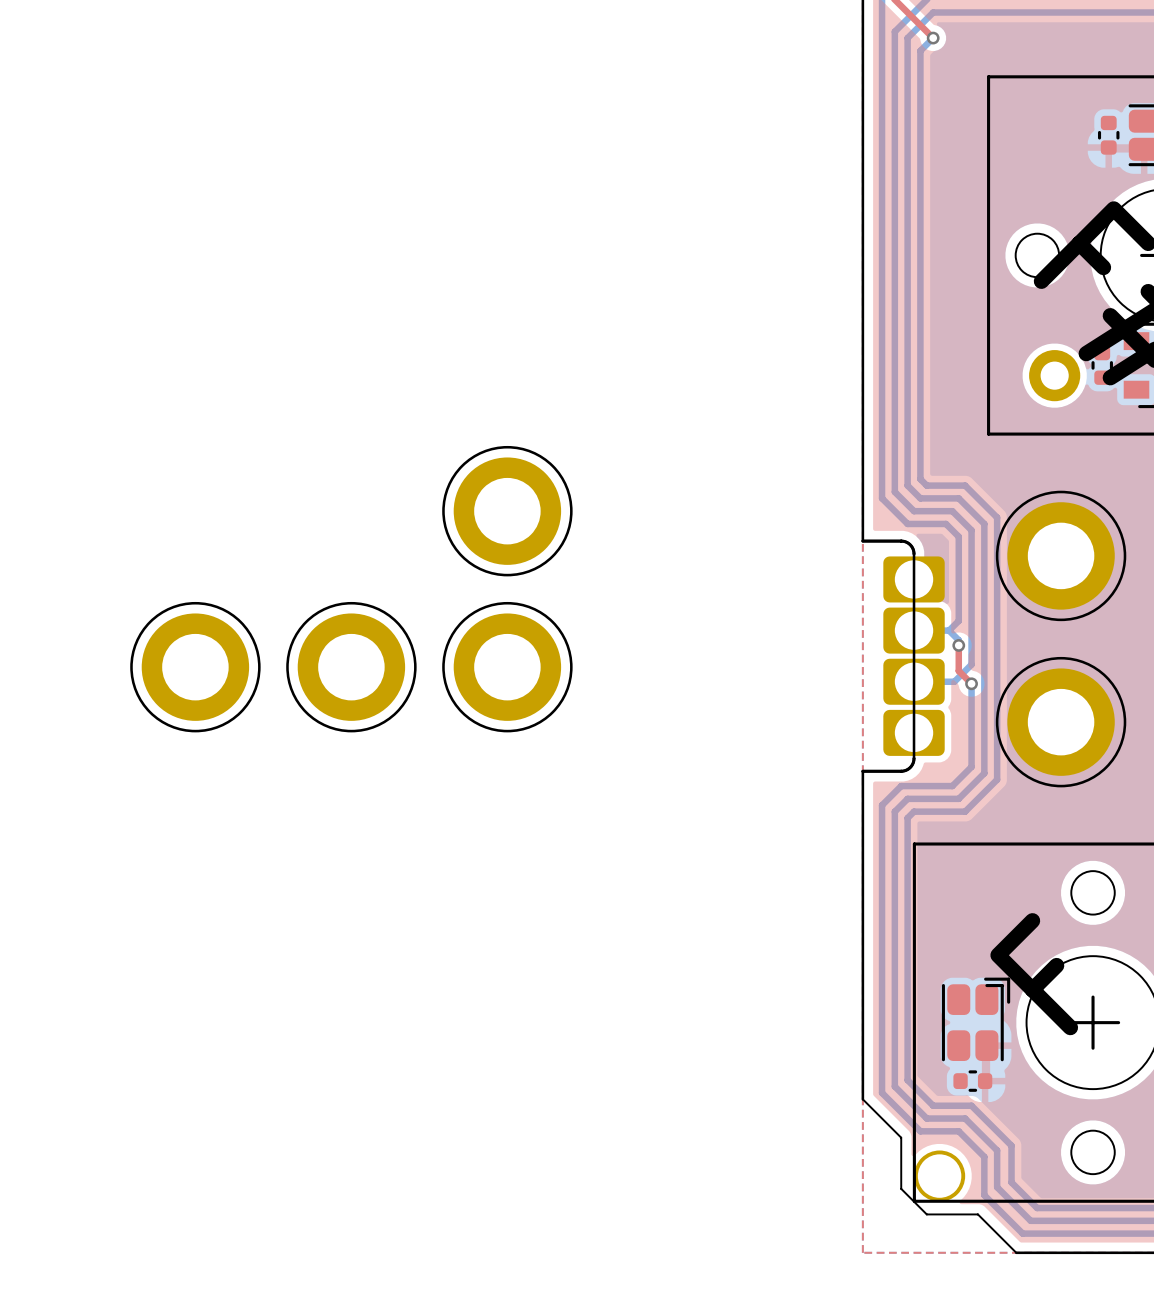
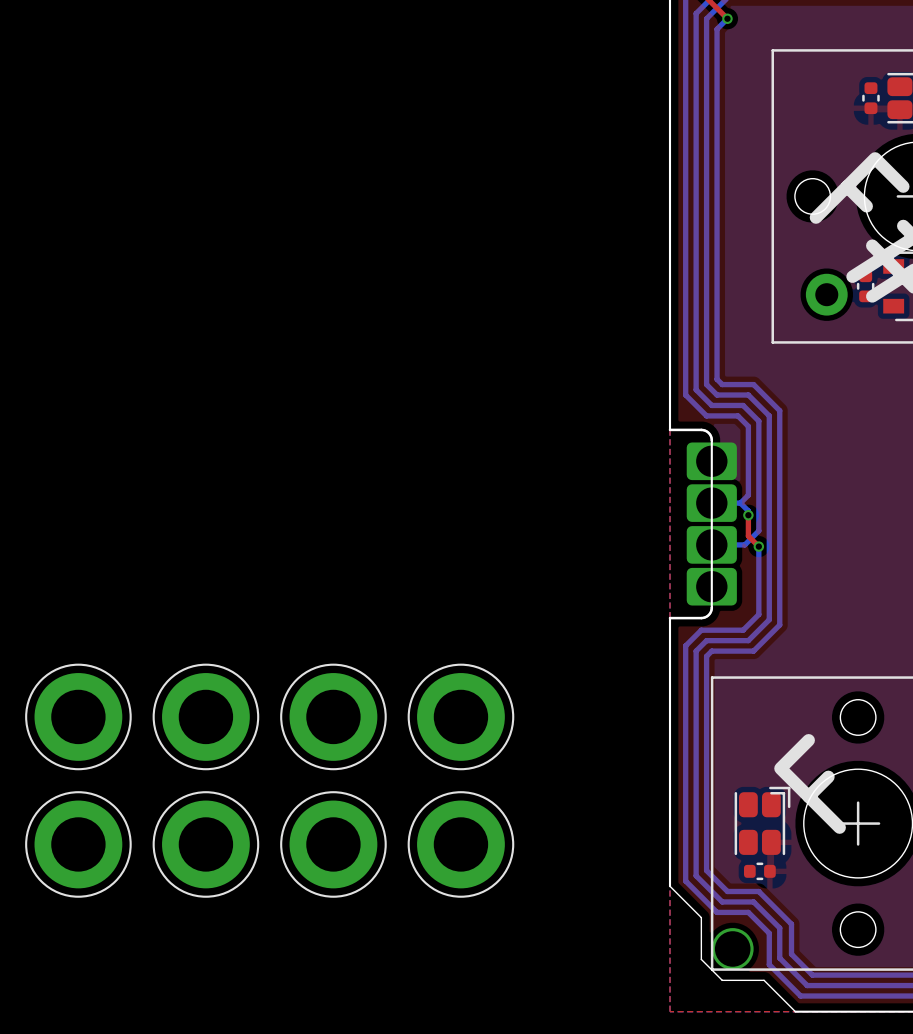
part: (507, 511) -> none
part: (1061, 555) -> none
part: (195, 667) -> none
part: (351, 667) -> none
part: (507, 667) -> none
part: (1061, 722) -> none
part: none -> (78, 716)
part: none -> (205, 716)
part: none -> (333, 716)
part: none -> (460, 716)
part: none -> (78, 844)
part: none -> (205, 844)
part: none -> (333, 844)
part: none -> (460, 844)

